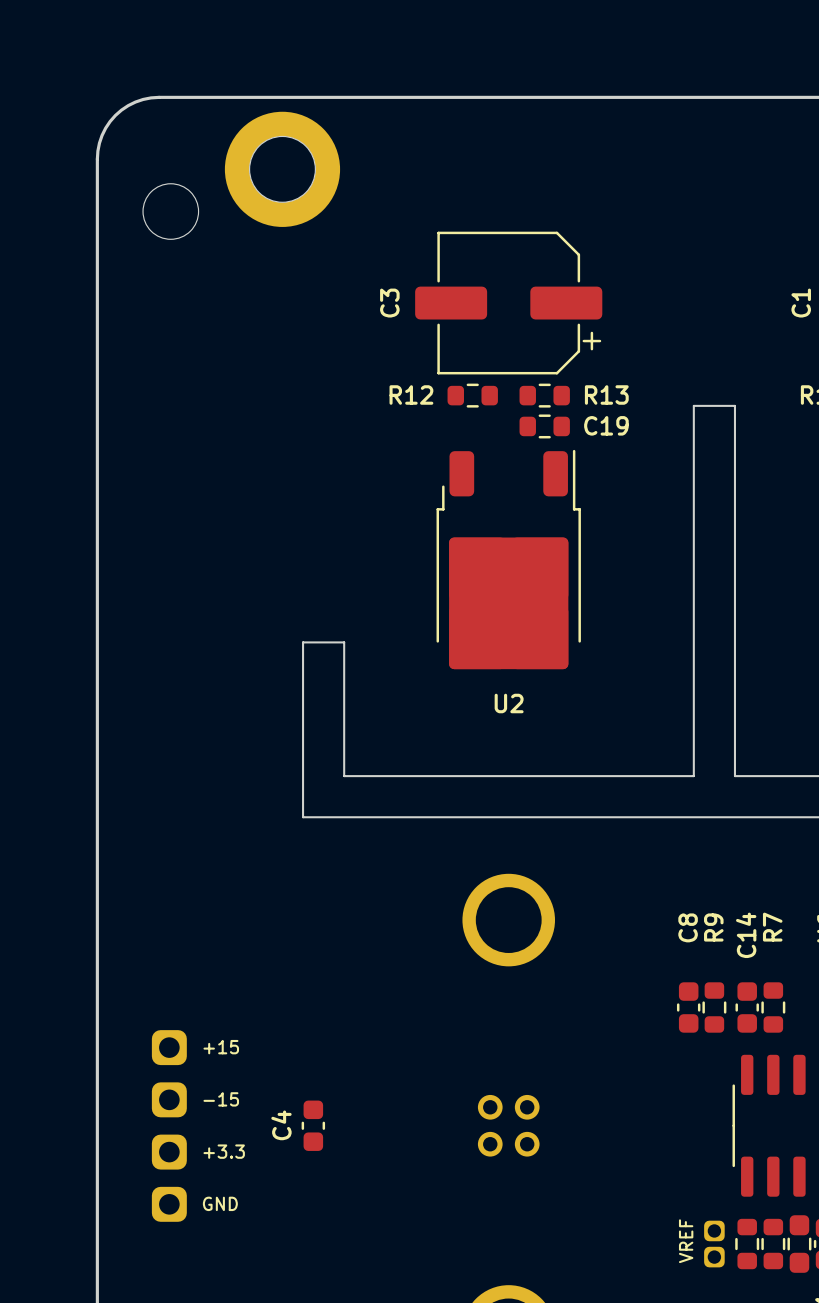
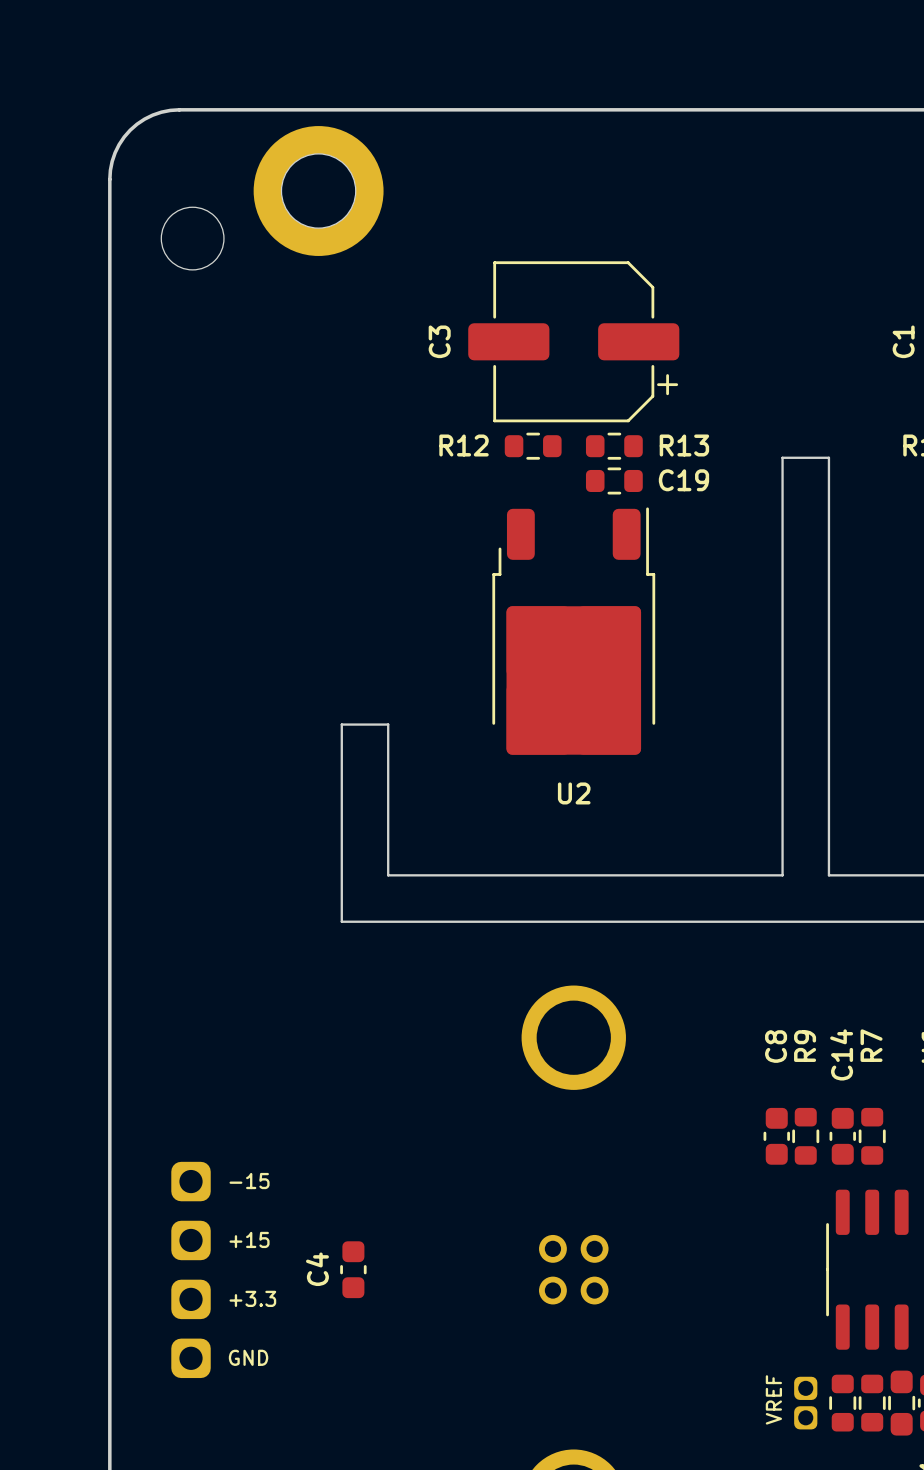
text: +15 (221, 1047) -> -15 (249, 1181)
text: -15 (221, 1099) -> +15 (249, 1239)

